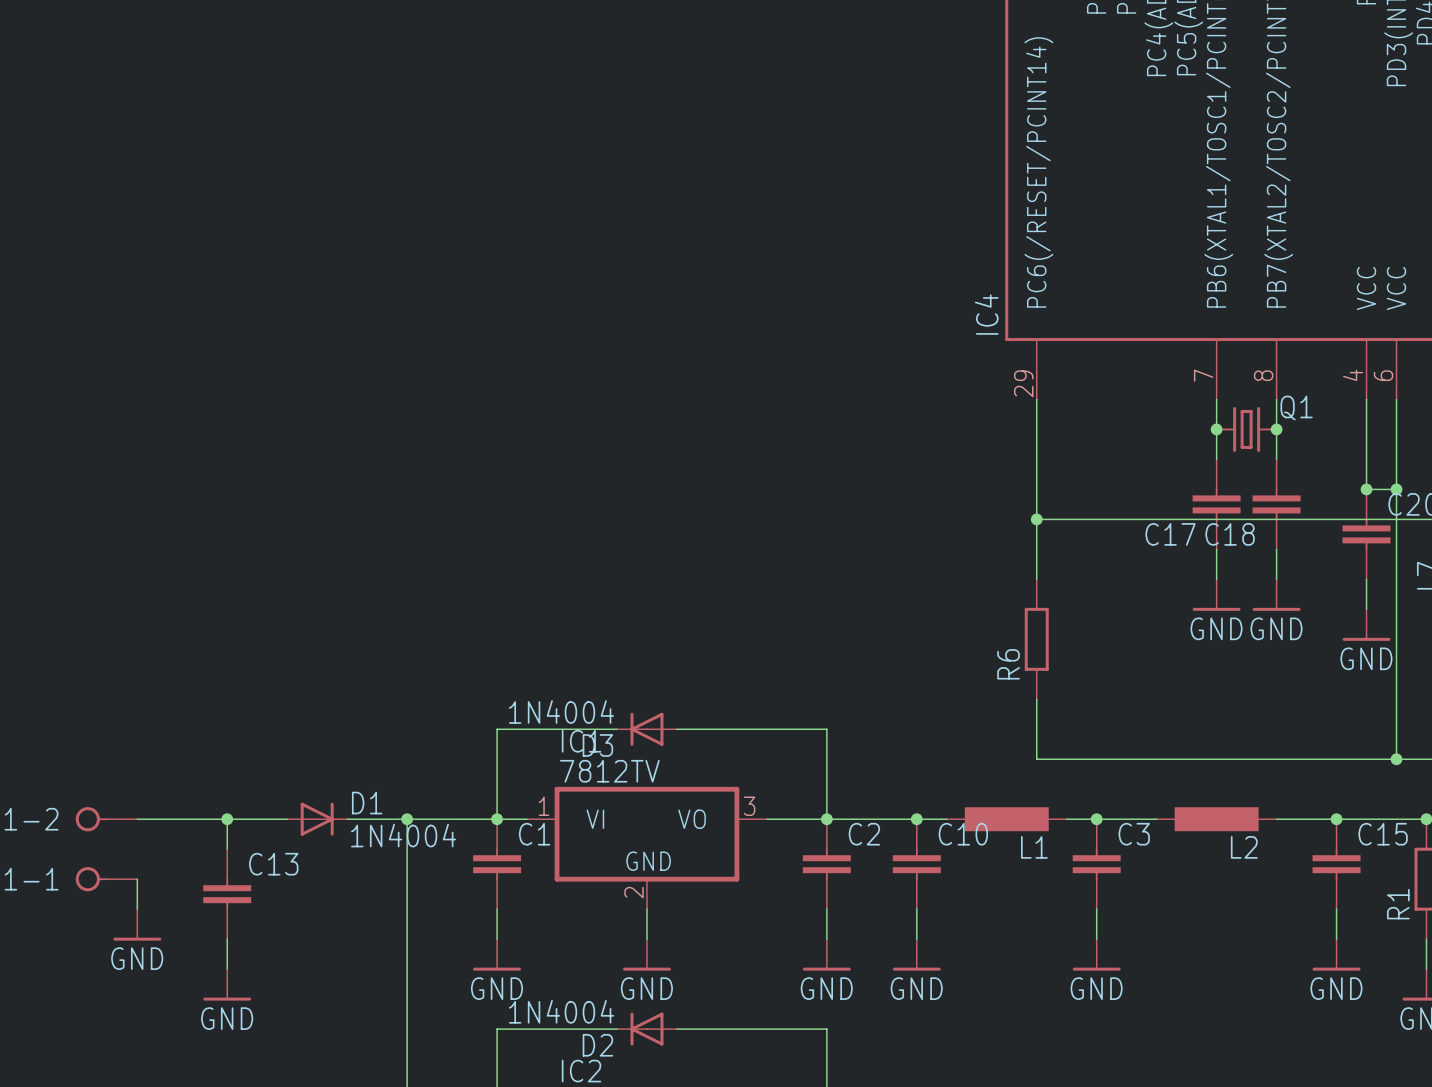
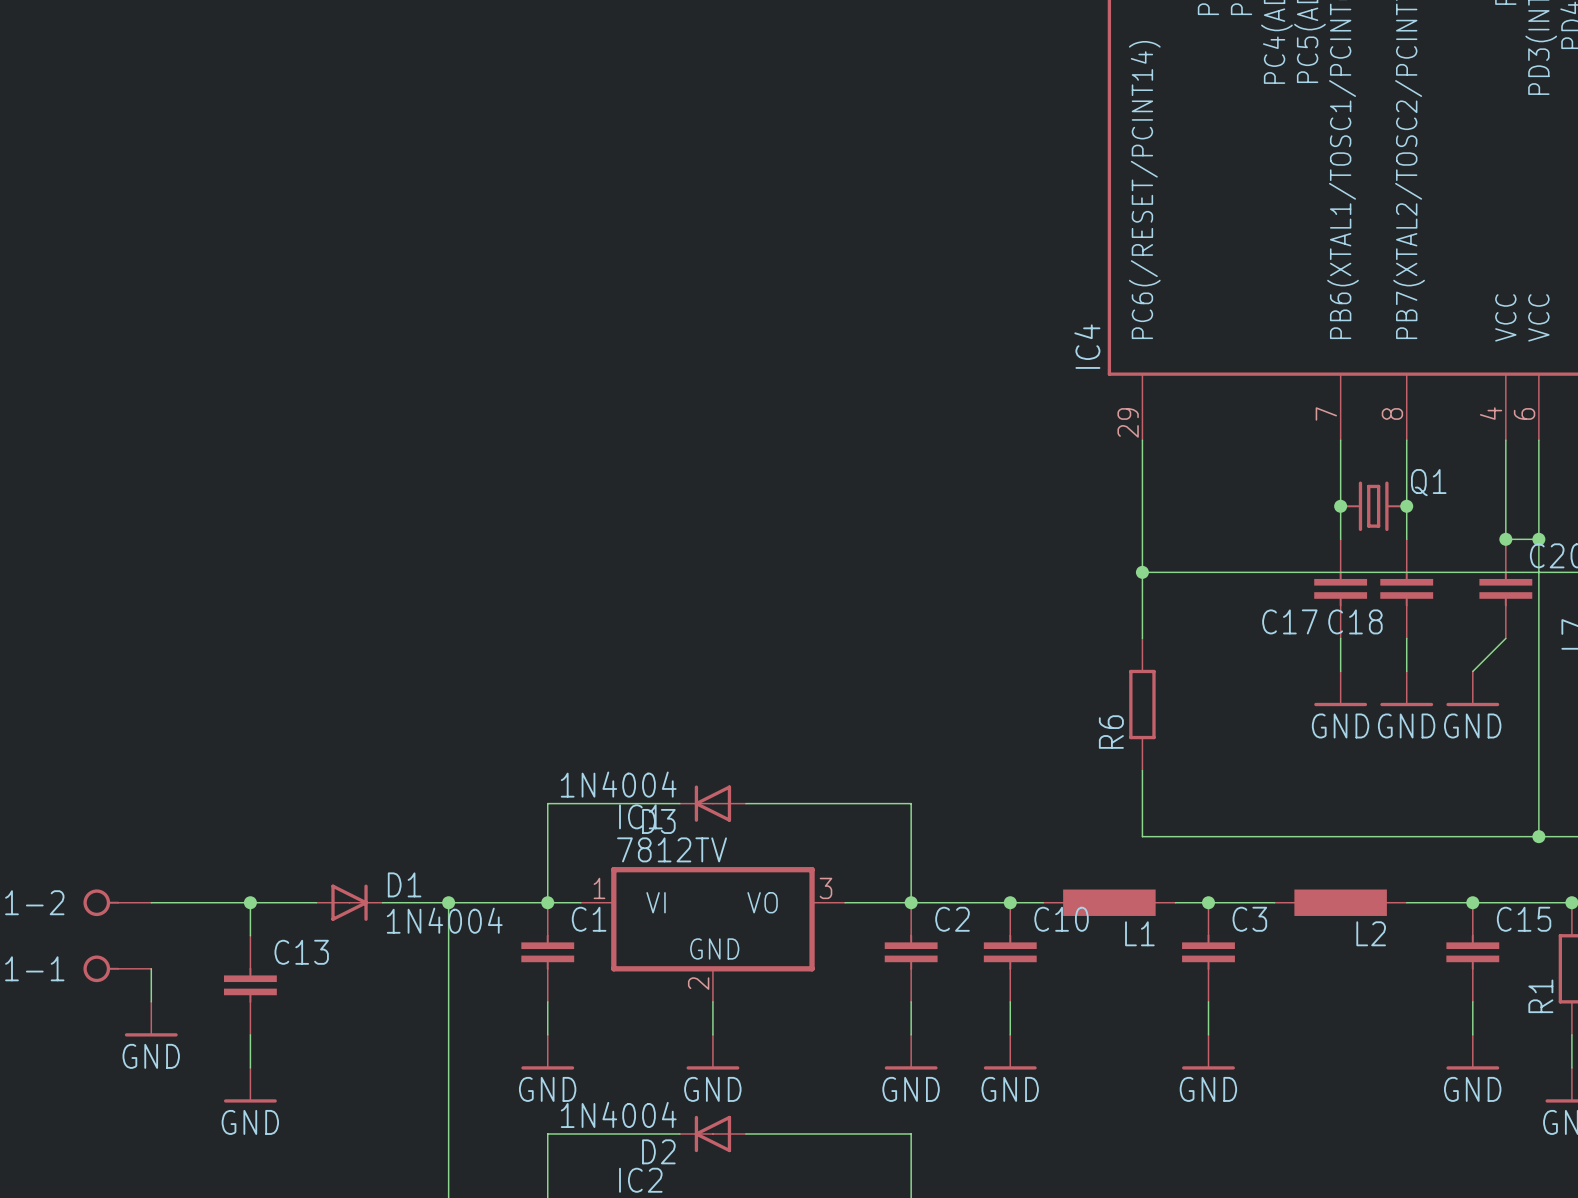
junction position: (1216, 429) -> (1340, 506)
Q1 position: (1246, 429) -> (1373, 506)
junction position: (1276, 429) -> (1406, 506)
C17 position: (1216, 504) -> (1340, 588)
C18 position: (1276, 504) -> (1406, 588)
wire: (1366, 579) (1366, 609) -> (1505, 638) (1472, 671)
power symbol position: GND (1216, 595) -> GND (1340, 688)
power symbol position: GND (1276, 595) -> GND (1406, 688)
power symbol position: GND (1366, 625) -> GND (1472, 688)

